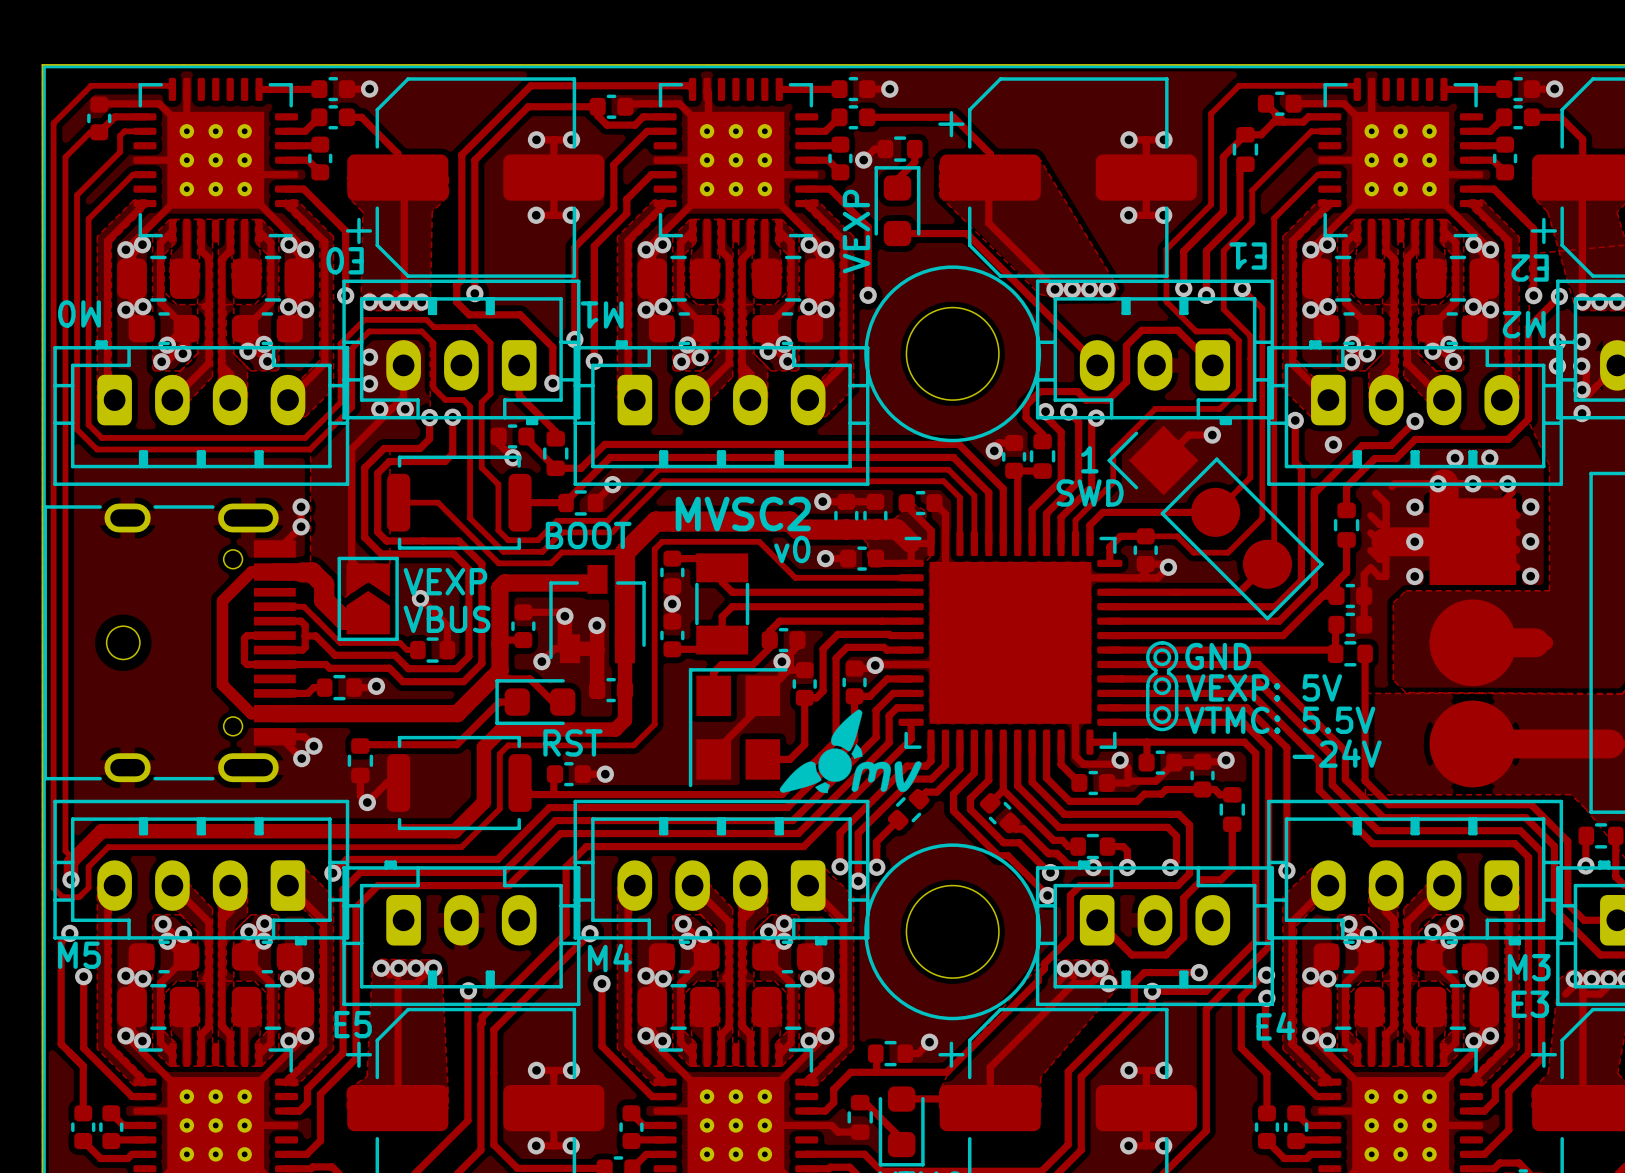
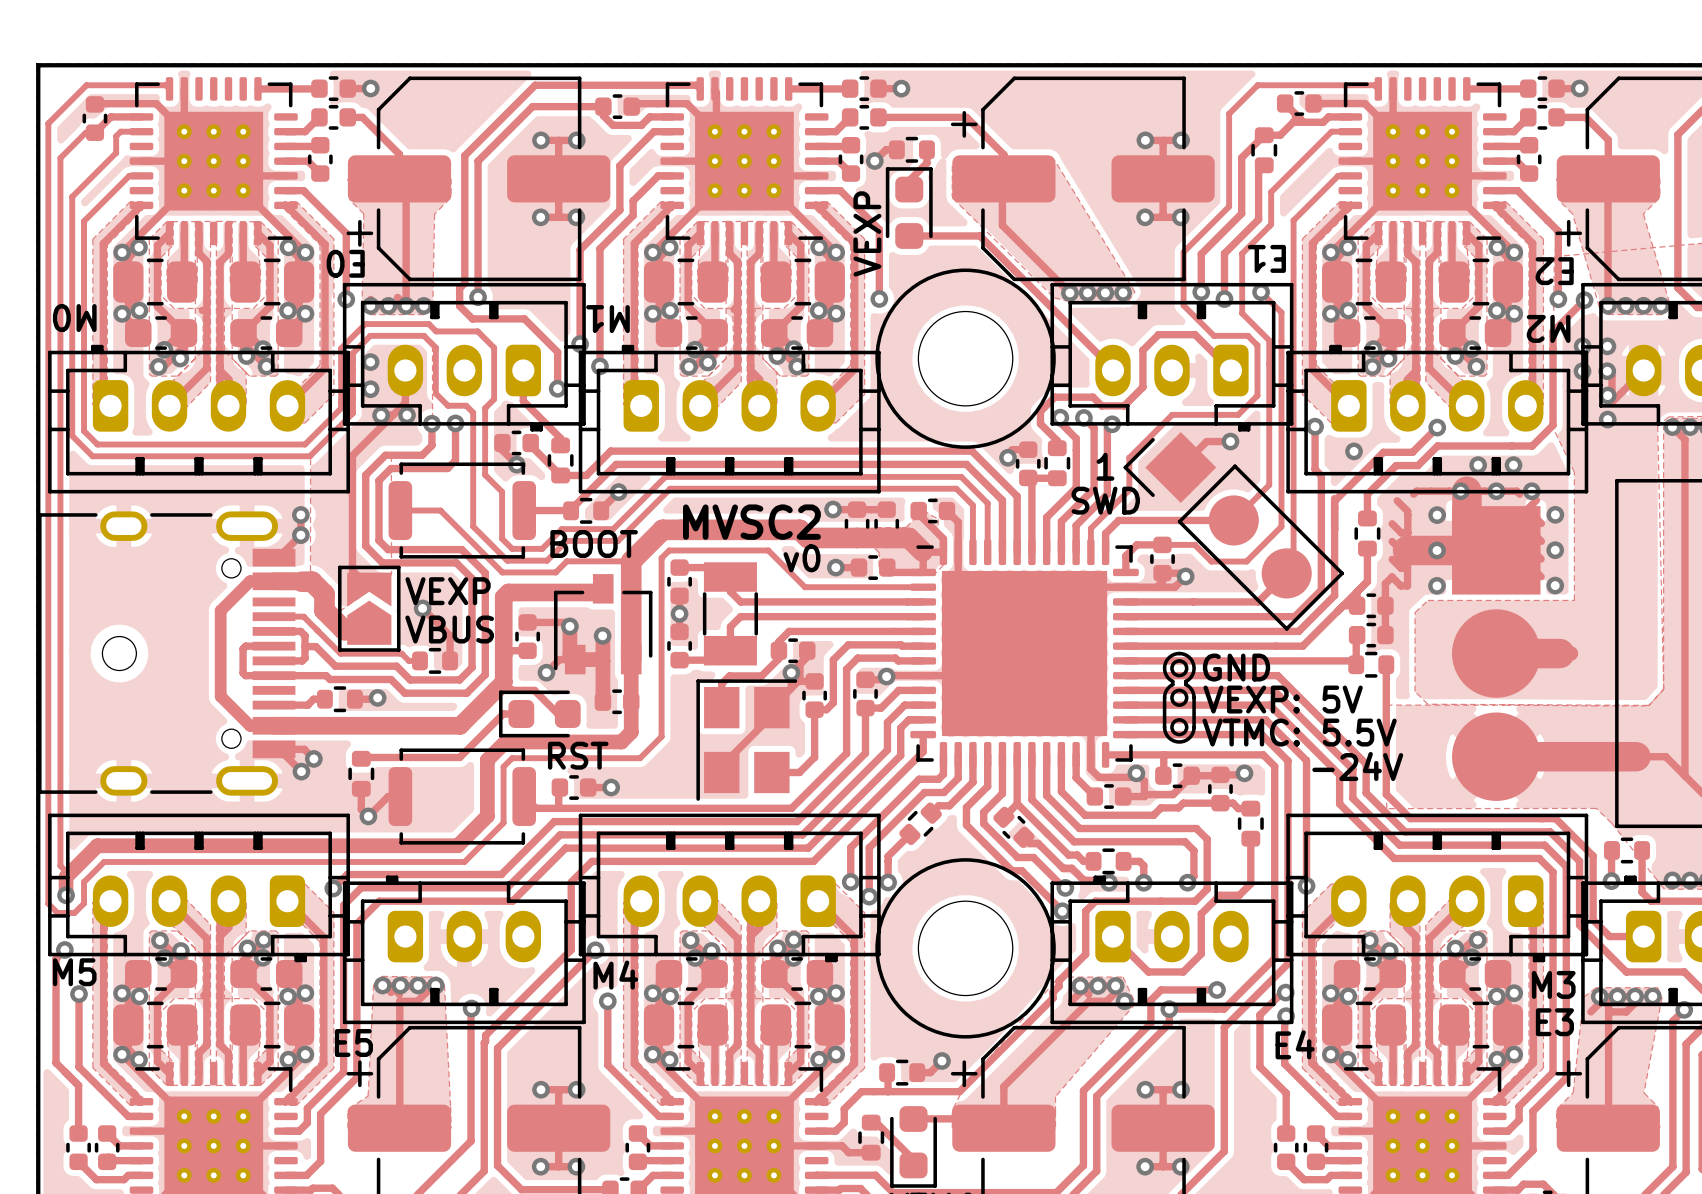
drawing: [779, 709, 922, 794] -> none

